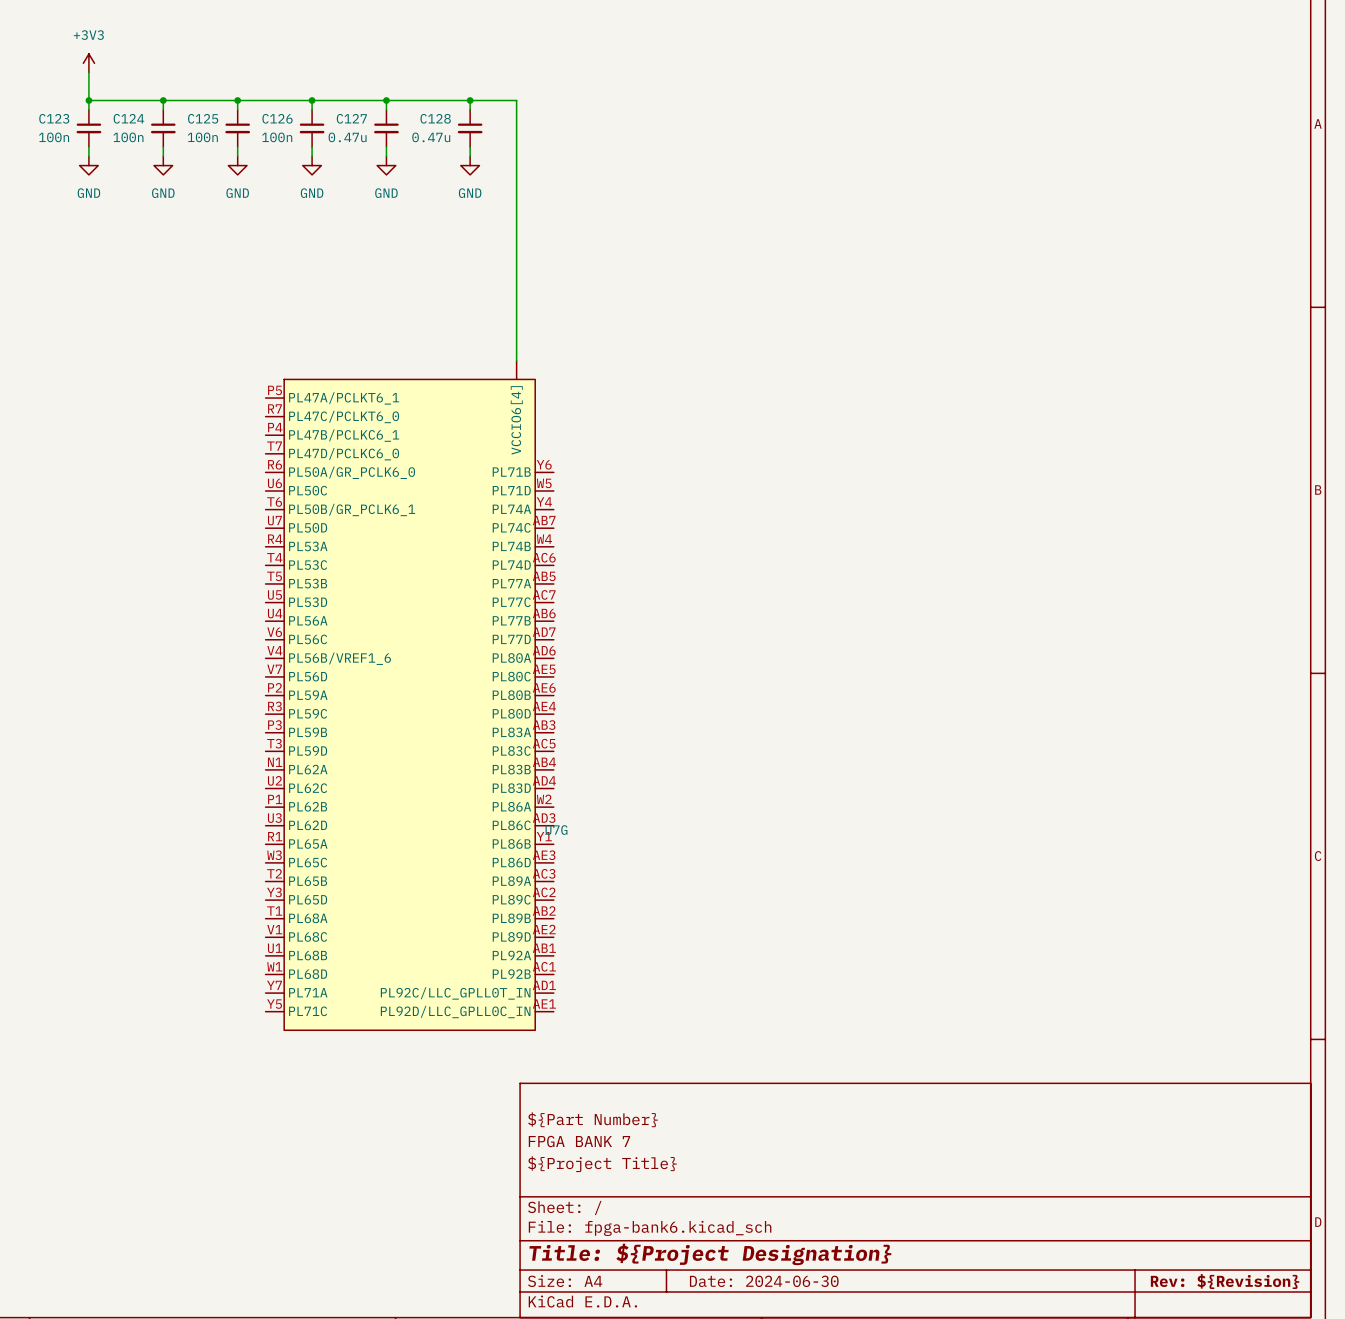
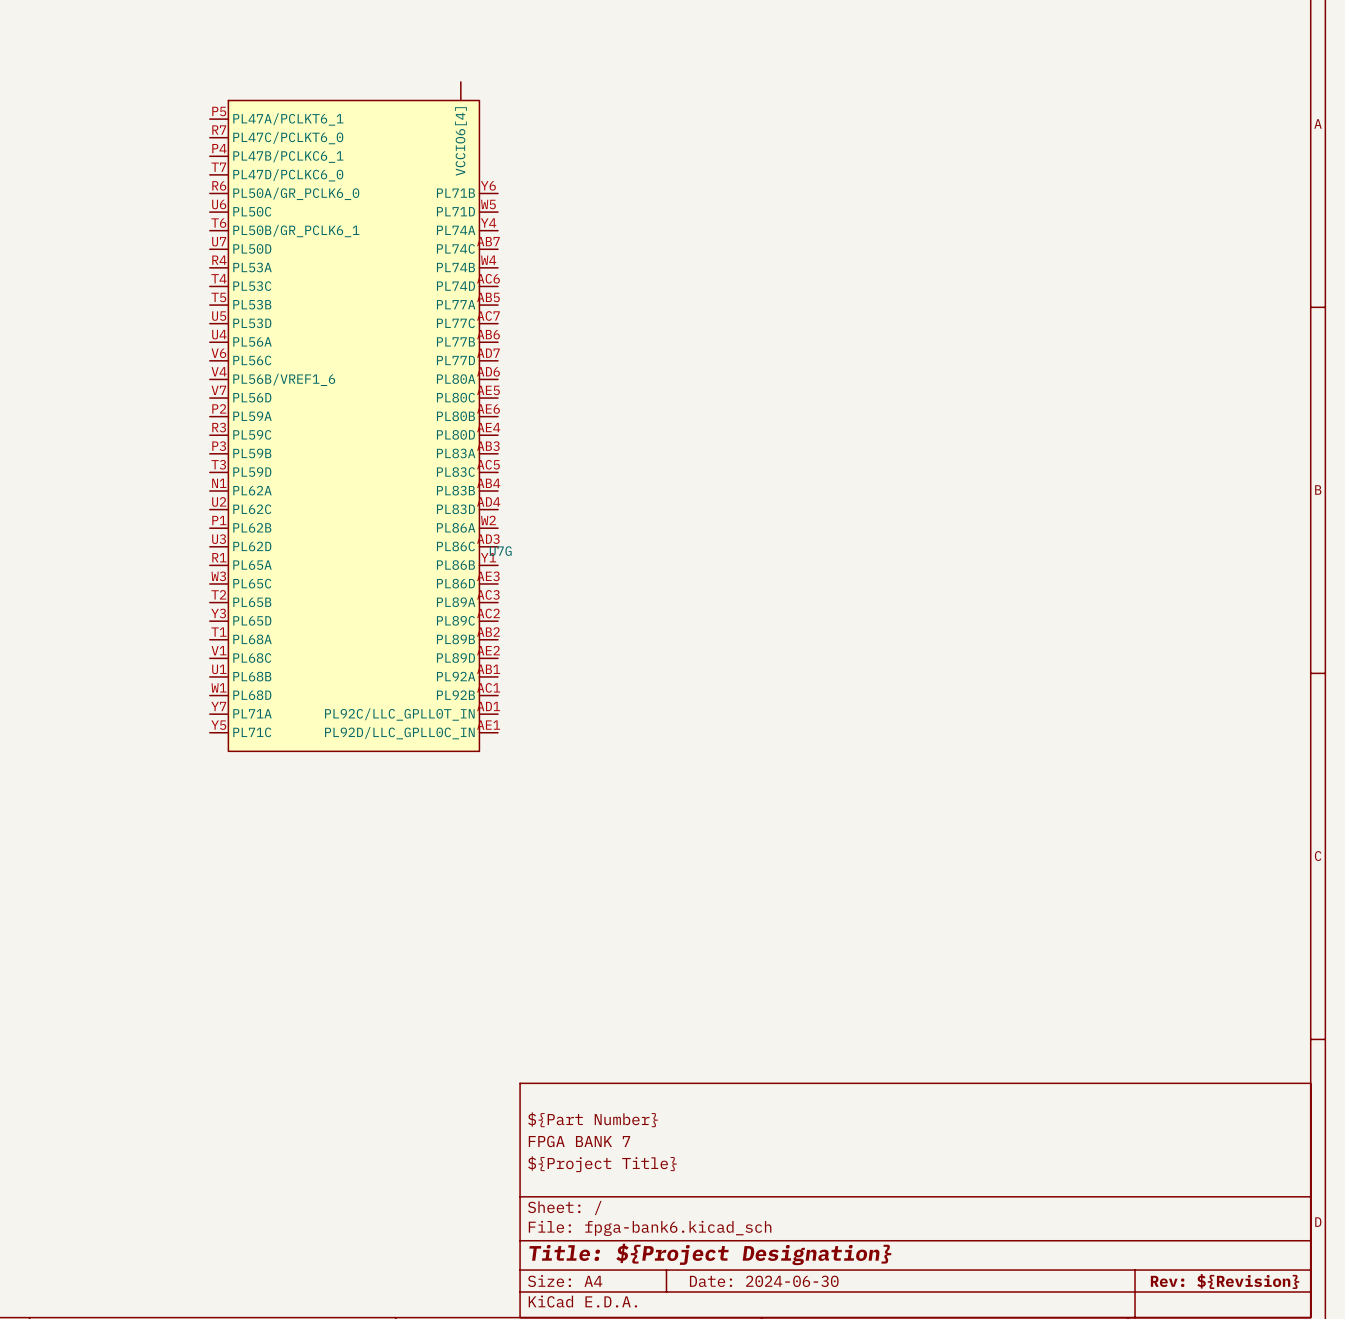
power symbol: +3V3 (88, 63) -> none
wire: (88, 72) (88, 109) -> none
wire: (88, 100) (516, 100) (516, 360) -> none
junction: (88, 100) -> none
wire: (163, 100) (163, 109) -> none
junction: (163, 100) -> none
junction: (237, 100) -> none
junction: (312, 100) -> none
junction: (386, 100) -> none
junction: (470, 100) -> none
C123: 100n (88, 128) -> none
C124: 100n (163, 128) -> none
C125: 100n (237, 128) -> none
C126: 100n (312, 128) -> none
C127: 0.47u (386, 128) -> none
C128: 0.47u (470, 128) -> none
wire: (88, 146) (88, 156) -> none
wire: (163, 146) (163, 156) -> none
power symbol: GND (88, 165) -> none
power symbol: GND (163, 165) -> none
power symbol: GND (237, 165) -> none
power symbol: GND (312, 165) -> none
power symbol: GND (386, 165) -> none
power symbol: GND (470, 165) -> none
U7G position: (409, 695) -> (353, 416)

